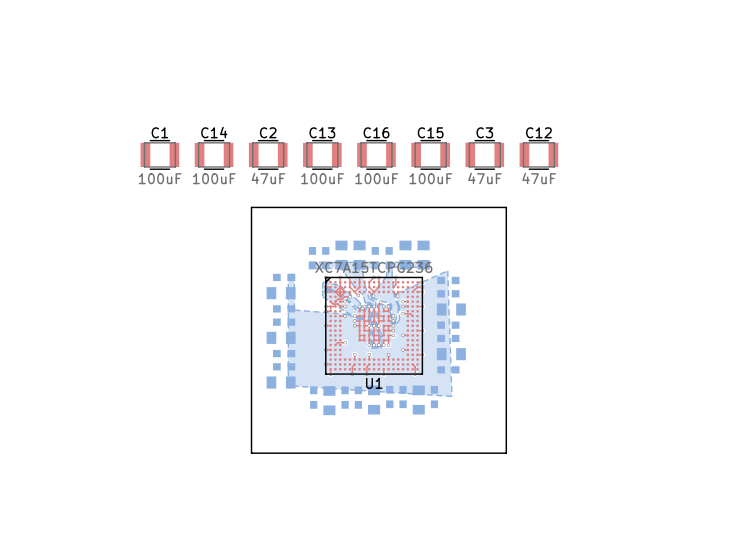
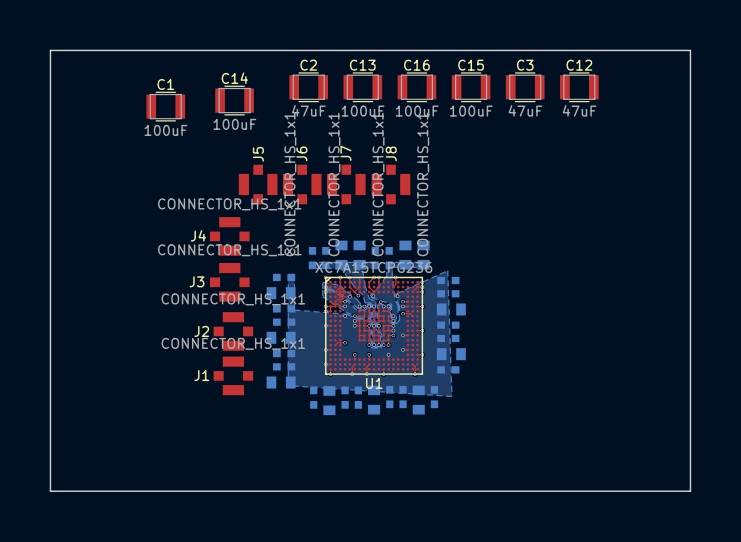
board edge: none -> (50, 50) (690, 50) (690, 491) (50, 491) (50, 50)
C1 position: (159, 154) -> (165, 106)
C14 position: (214, 154) -> (234, 100)
C2 position: (268, 154) -> (308, 87)
C13 position: (322, 154) -> (362, 87)
C16 position: (376, 154) -> (416, 87)
C15 position: (430, 154) -> (471, 87)
C3 position: (484, 154) -> (525, 87)
C12 position: (538, 154) -> (579, 87)
J5: none -> CONNECTOR_HS_1x1 (258, 184)
J6: none -> CONNECTOR_HS_1x1 (302, 184)
J7: none -> CONNECTOR_HS_1x1 (346, 184)
J8: none -> CONNECTOR_HS_1x1 (390, 184)
board edge: (251, 207) (506, 207) (506, 453) (251, 453) (251, 207) -> none
J4: none -> CONNECTOR_HS_1x1 (229, 236)
J3: none -> CONNECTOR_HS_1x1 (229, 282)
J2: none -> CONNECTOR_HS_1x1 (233, 331)
J1: none -> CONNECTOR_HS_1x1 (233, 375)

